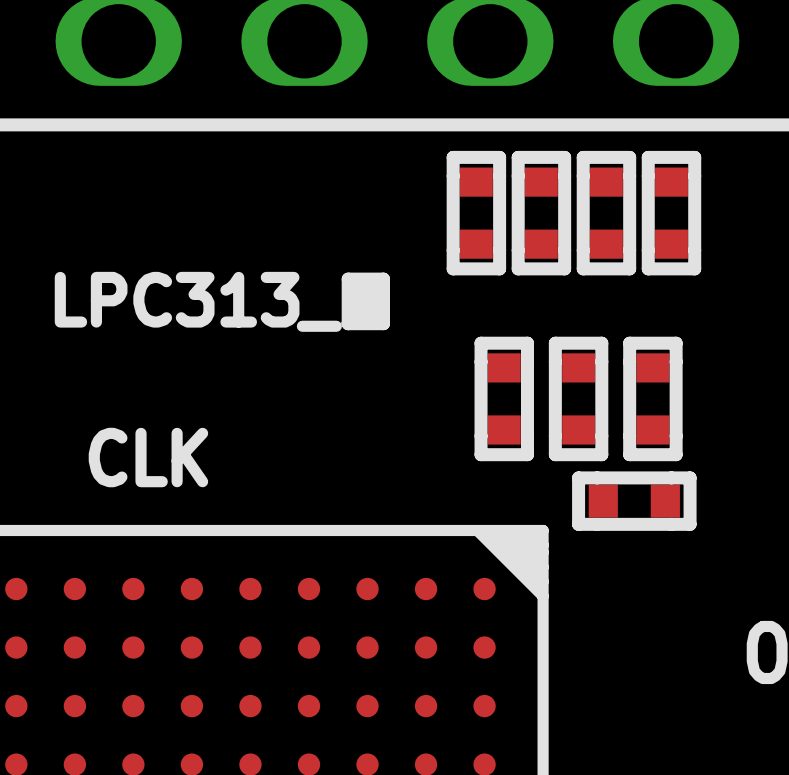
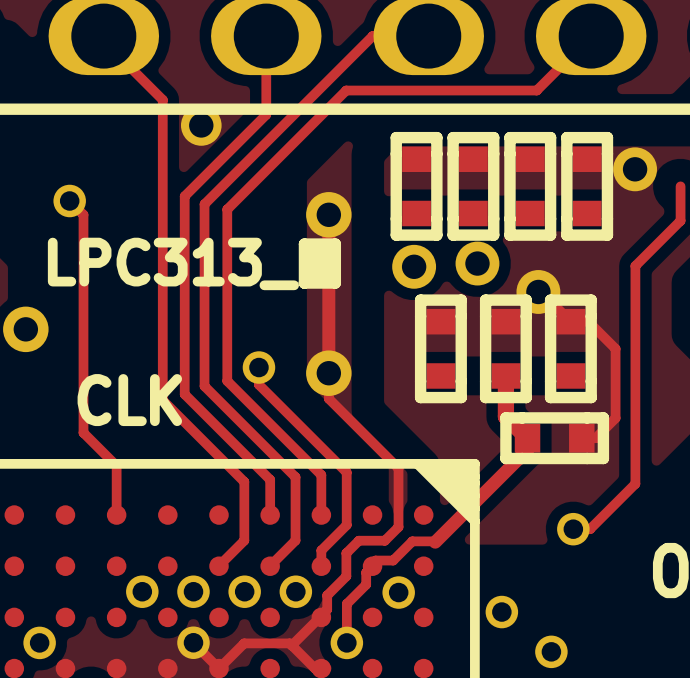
track: none -> (103, 36) (103, 40) (162, 99) (162, 400) (244, 481) (244, 540) (219, 565)
track: none -> (266, 36) (266, 114) (184, 196) (184, 394) (270, 479) (270, 515)
track: none -> (428, 36) (372, 36) (204, 204) (204, 386) (295, 477) (295, 540) (270, 565)
track: none -> (591, 36) (536, 90) (346, 90) (227, 209) (227, 381) (321, 475) (321, 515)
part: none -> (201, 125)
part: none -> (635, 169)
track: none -> (680, 186) (680, 220) (635, 265) (635, 483) (590, 529) (573, 529)
track: none -> (69, 200) (83, 214) (83, 432) (116, 465) (116, 515)
part: none -> (69, 200)
track: none -> (328, 214) (328, 398) (398, 468) (398, 527) (384, 540) (358, 540) (346, 553) (346, 576) (327, 595) (327, 609) (291, 645)
part: none -> (328, 214)
part: none -> (477, 263)
part: none -> (414, 266)
part: none -> (538, 291)
track: none -> (541, 291) (570, 321) (588, 321) (615, 348) (615, 418) (595, 438) (581, 438)
part: none -> (25, 329)
track: none -> (258, 367) (258, 384) (346, 472) (346, 525) (321, 550) (321, 566)
part: none -> (258, 367)
part: none -> (328, 373)
track: none -> (505, 375) (505, 416) (527, 438) (527, 449) (435, 542)
part: none -> (573, 529)
track: none -> (436, 541) (412, 541) (393, 560) (375, 560) (372, 563) (372, 566) (366, 572) (366, 584) (346, 603) (346, 642)
part: none -> (142, 591)
part: none -> (193, 591)
part: none -> (244, 591)
part: none -> (295, 591)
part: none -> (398, 592)
part: none -> (501, 612)
part: none -> (39, 642)
track: none -> (193, 643) (219, 668) (244, 643) (289, 643) (315, 668) (321, 668)
part: none -> (193, 642)
part: none -> (346, 642)
part: none -> (551, 651)

